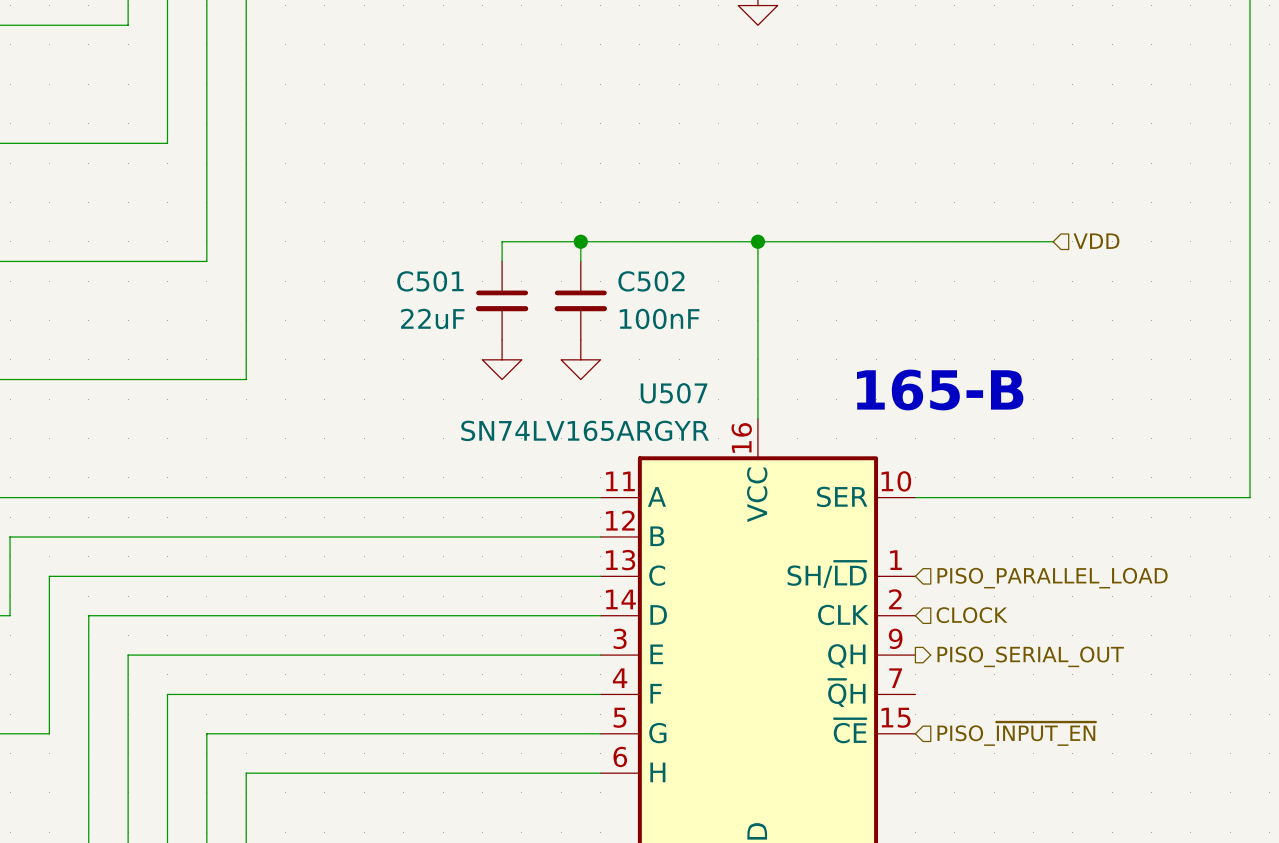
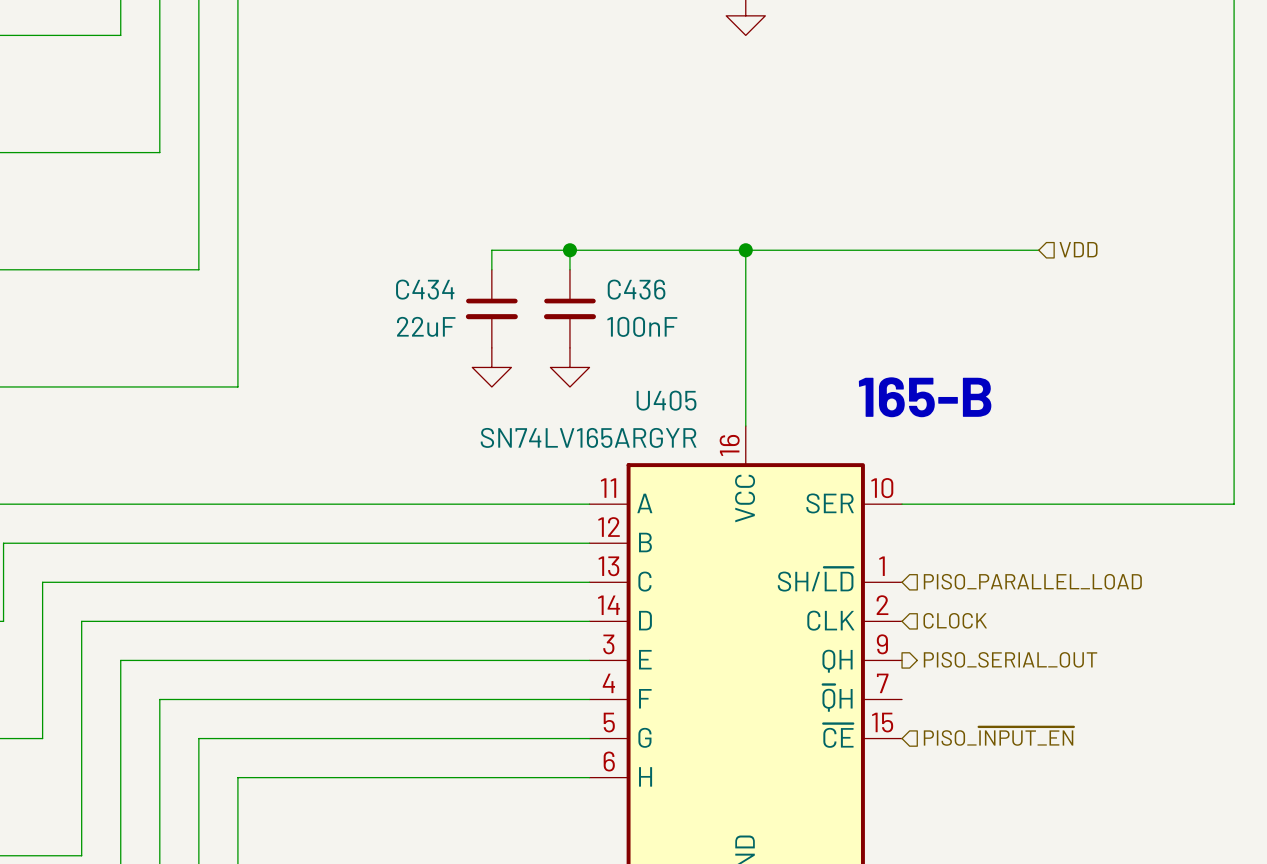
C501 name: C501 (430, 281) -> C434 (425, 289)
C502 name: C502 (651, 281) -> C436 (636, 289)
U507 name: U507 (674, 393) -> U405 (666, 400)

